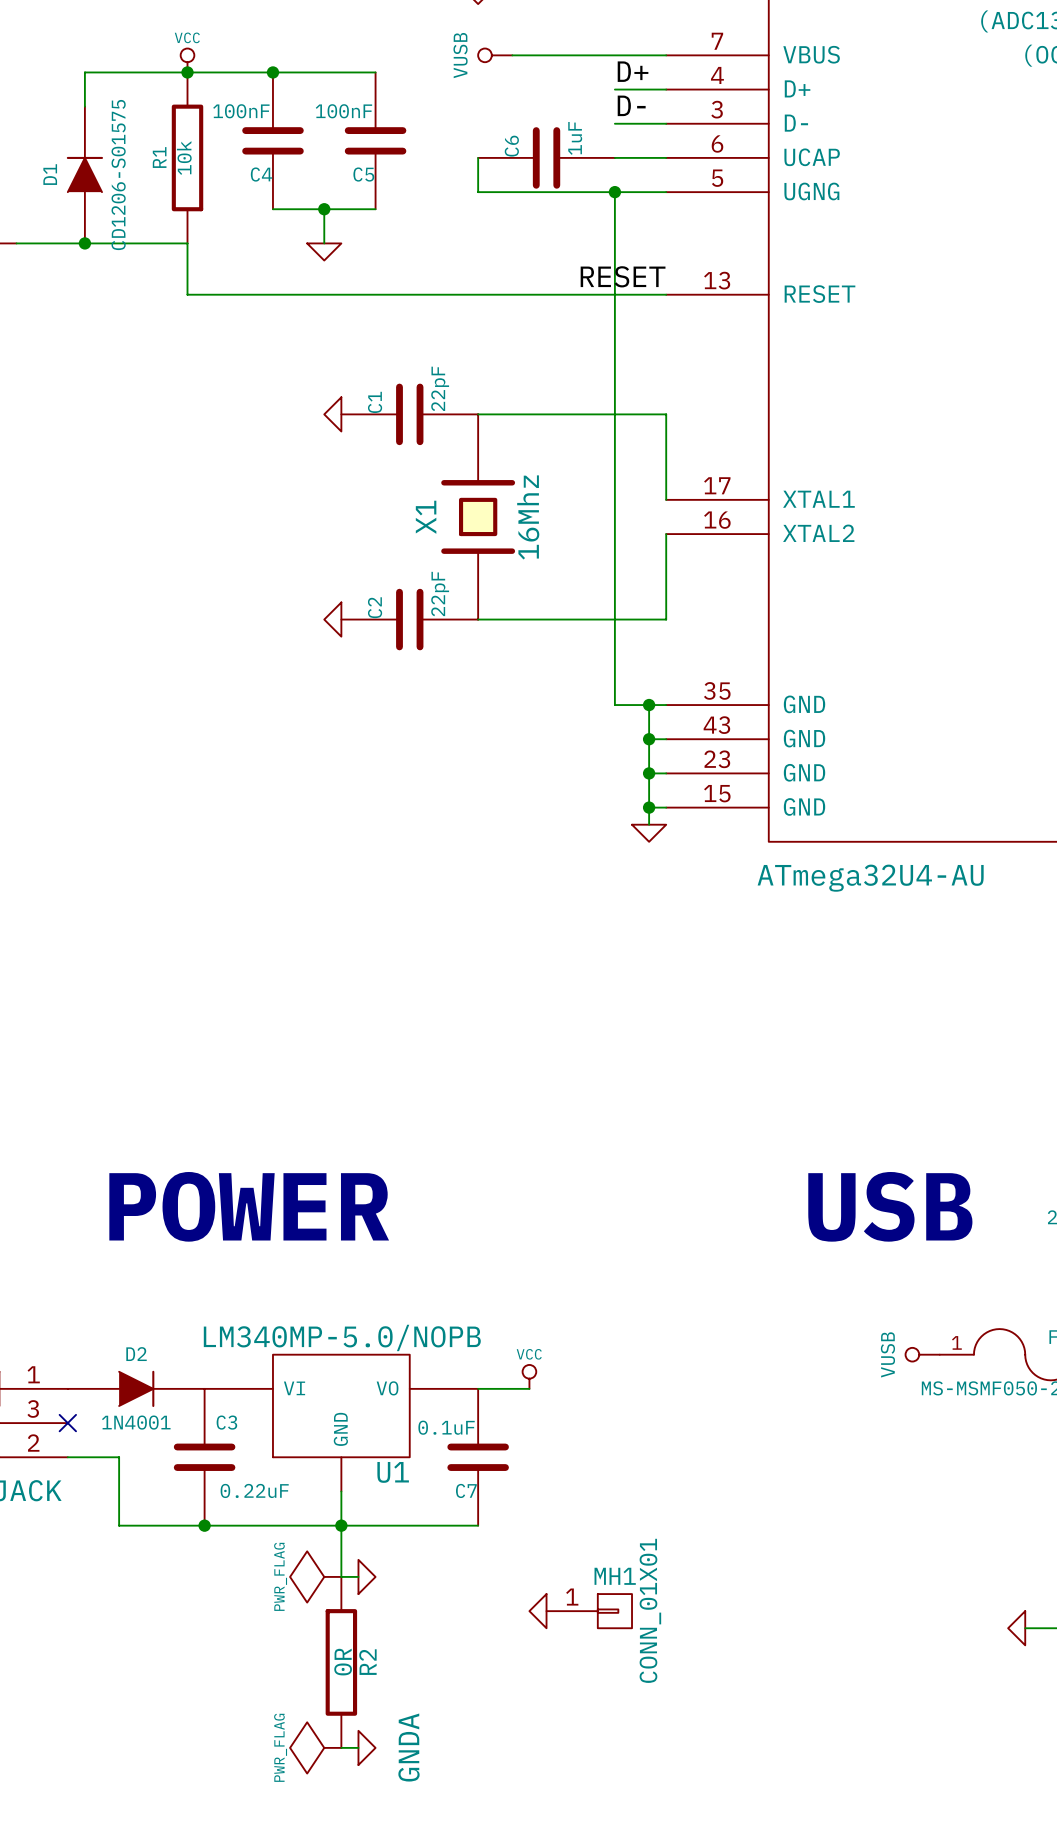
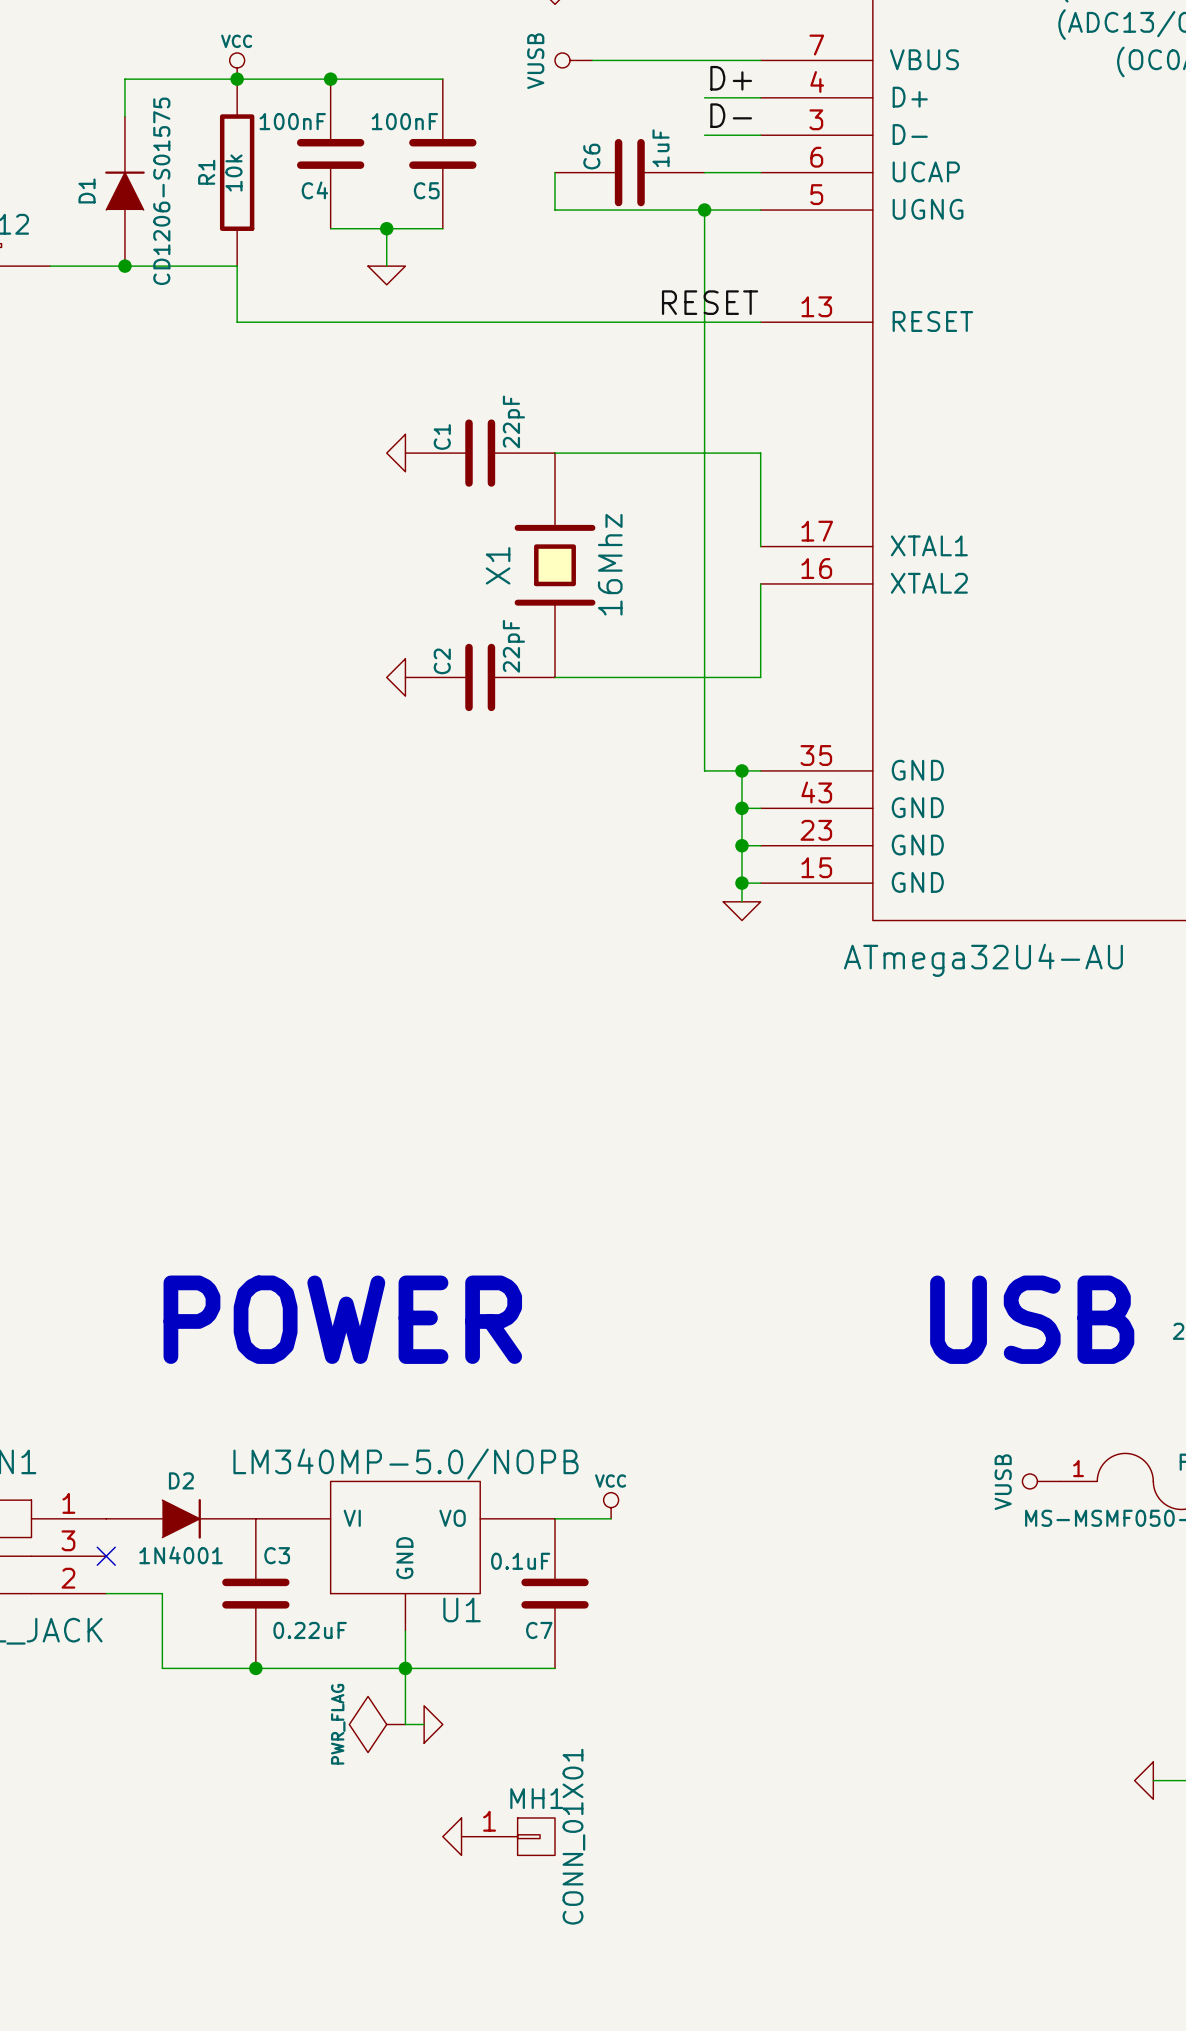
power symbol position: (537, 1611) -> (452, 1836)
MH1 position: (589, 1611) -> (508, 1836)
R2: 0R (341, 1662) -> none
power symbol: PWR_FLAG (315, 1747) -> none
wire: (341, 1747) (358, 1747) -> none
power symbol: GNDA (367, 1747) -> none

